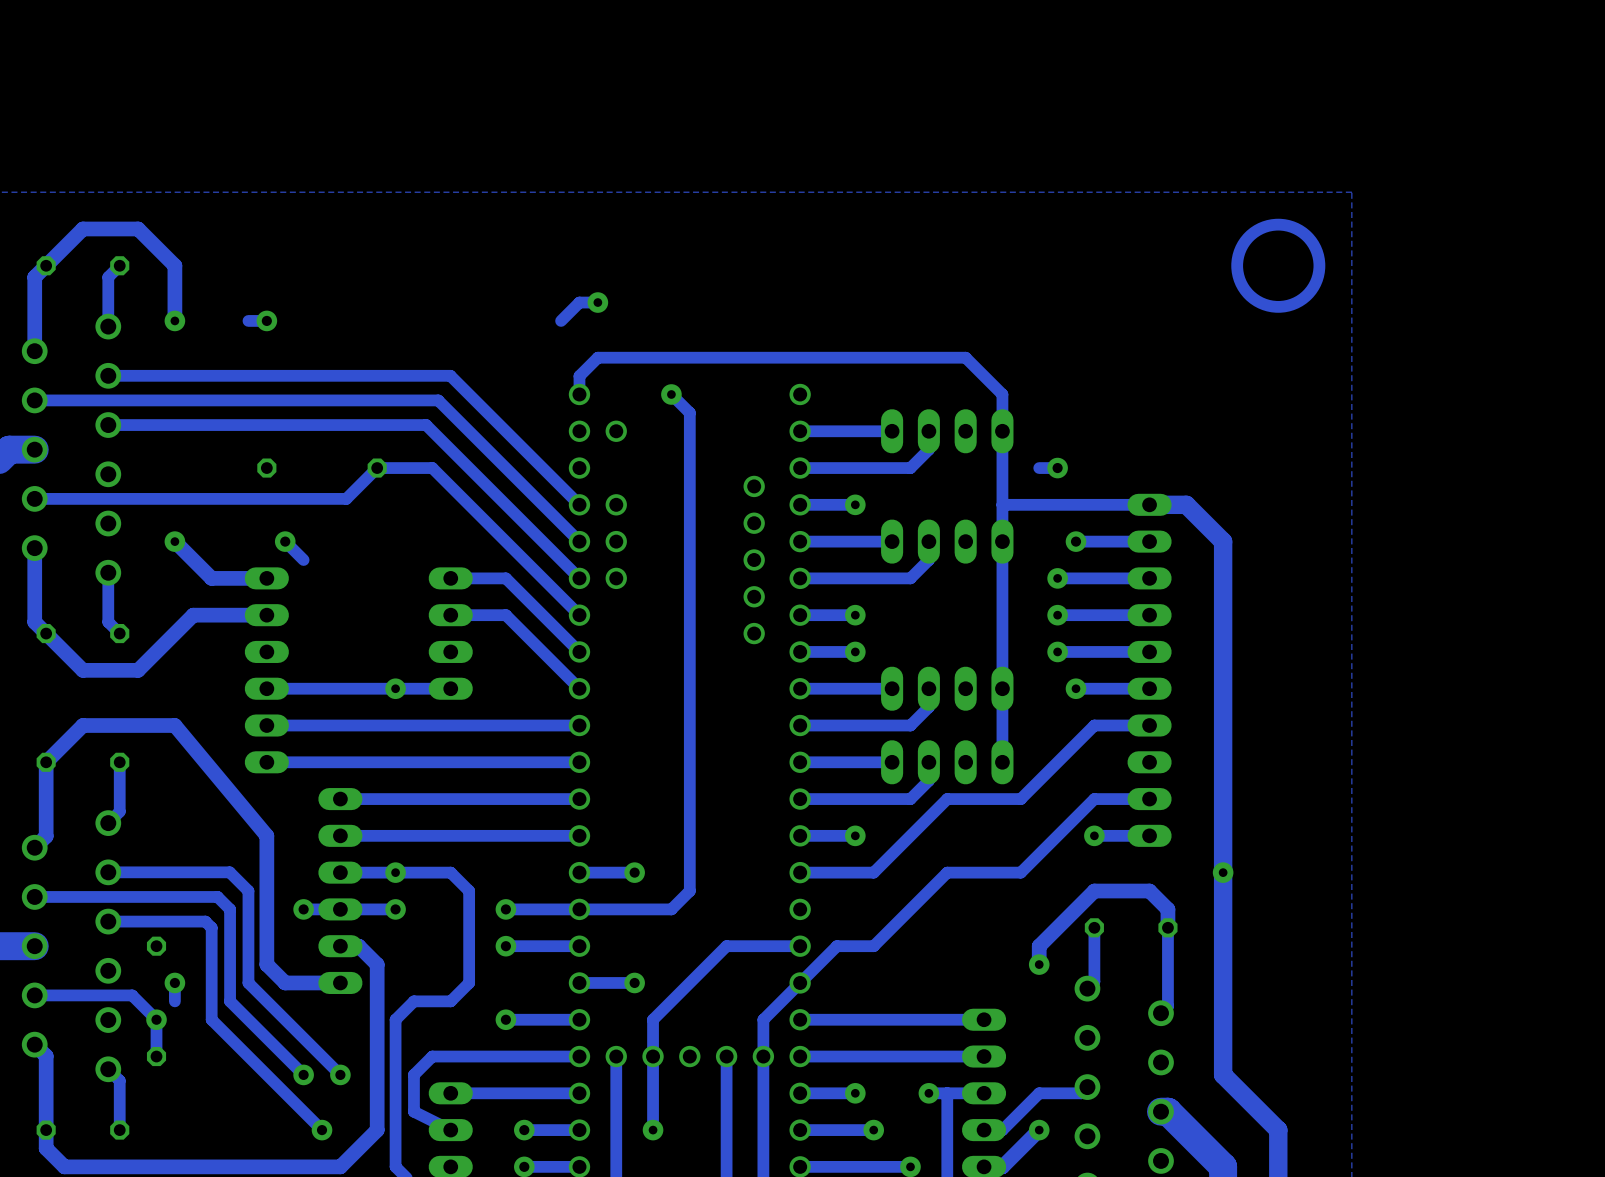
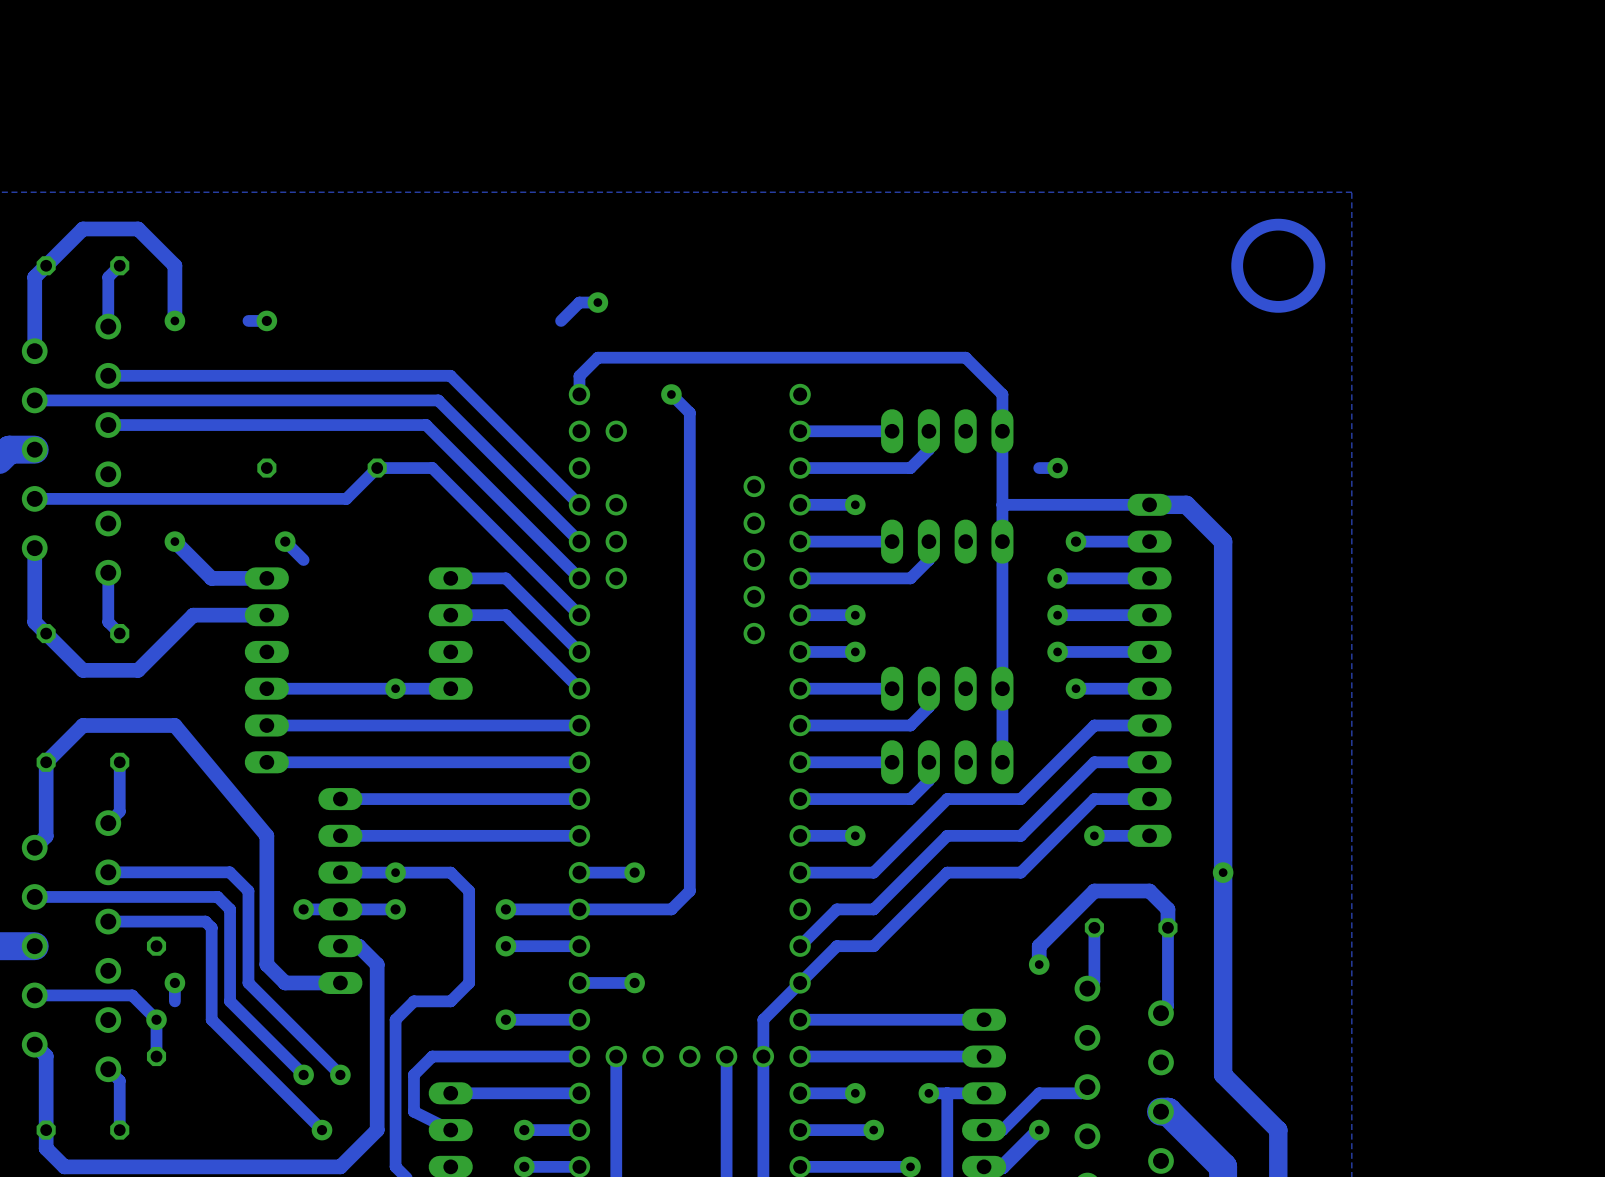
track: (800, 946) (726, 946) (653, 1019) (653, 1130) -> (800, 946) (836, 909) (873, 909) (947, 835) (1020, 835) (1094, 762) (1149, 762)
via: (653, 1130) -> none

